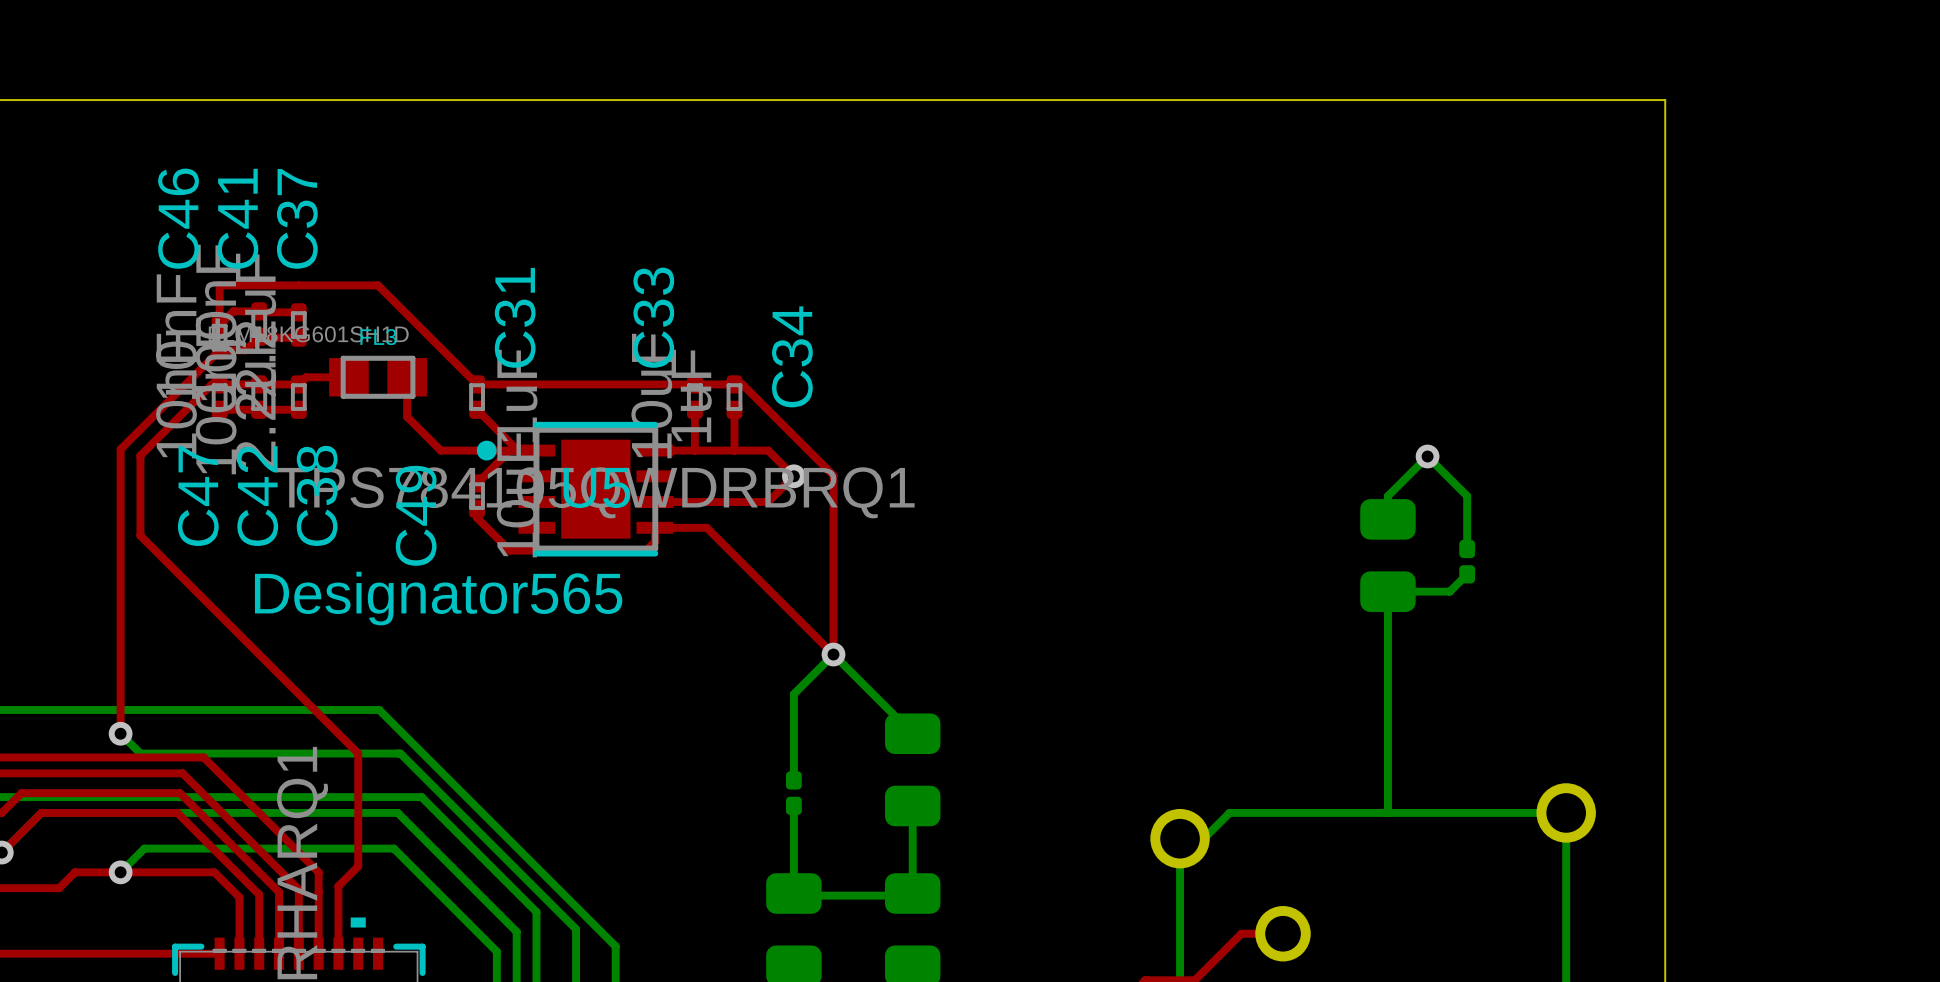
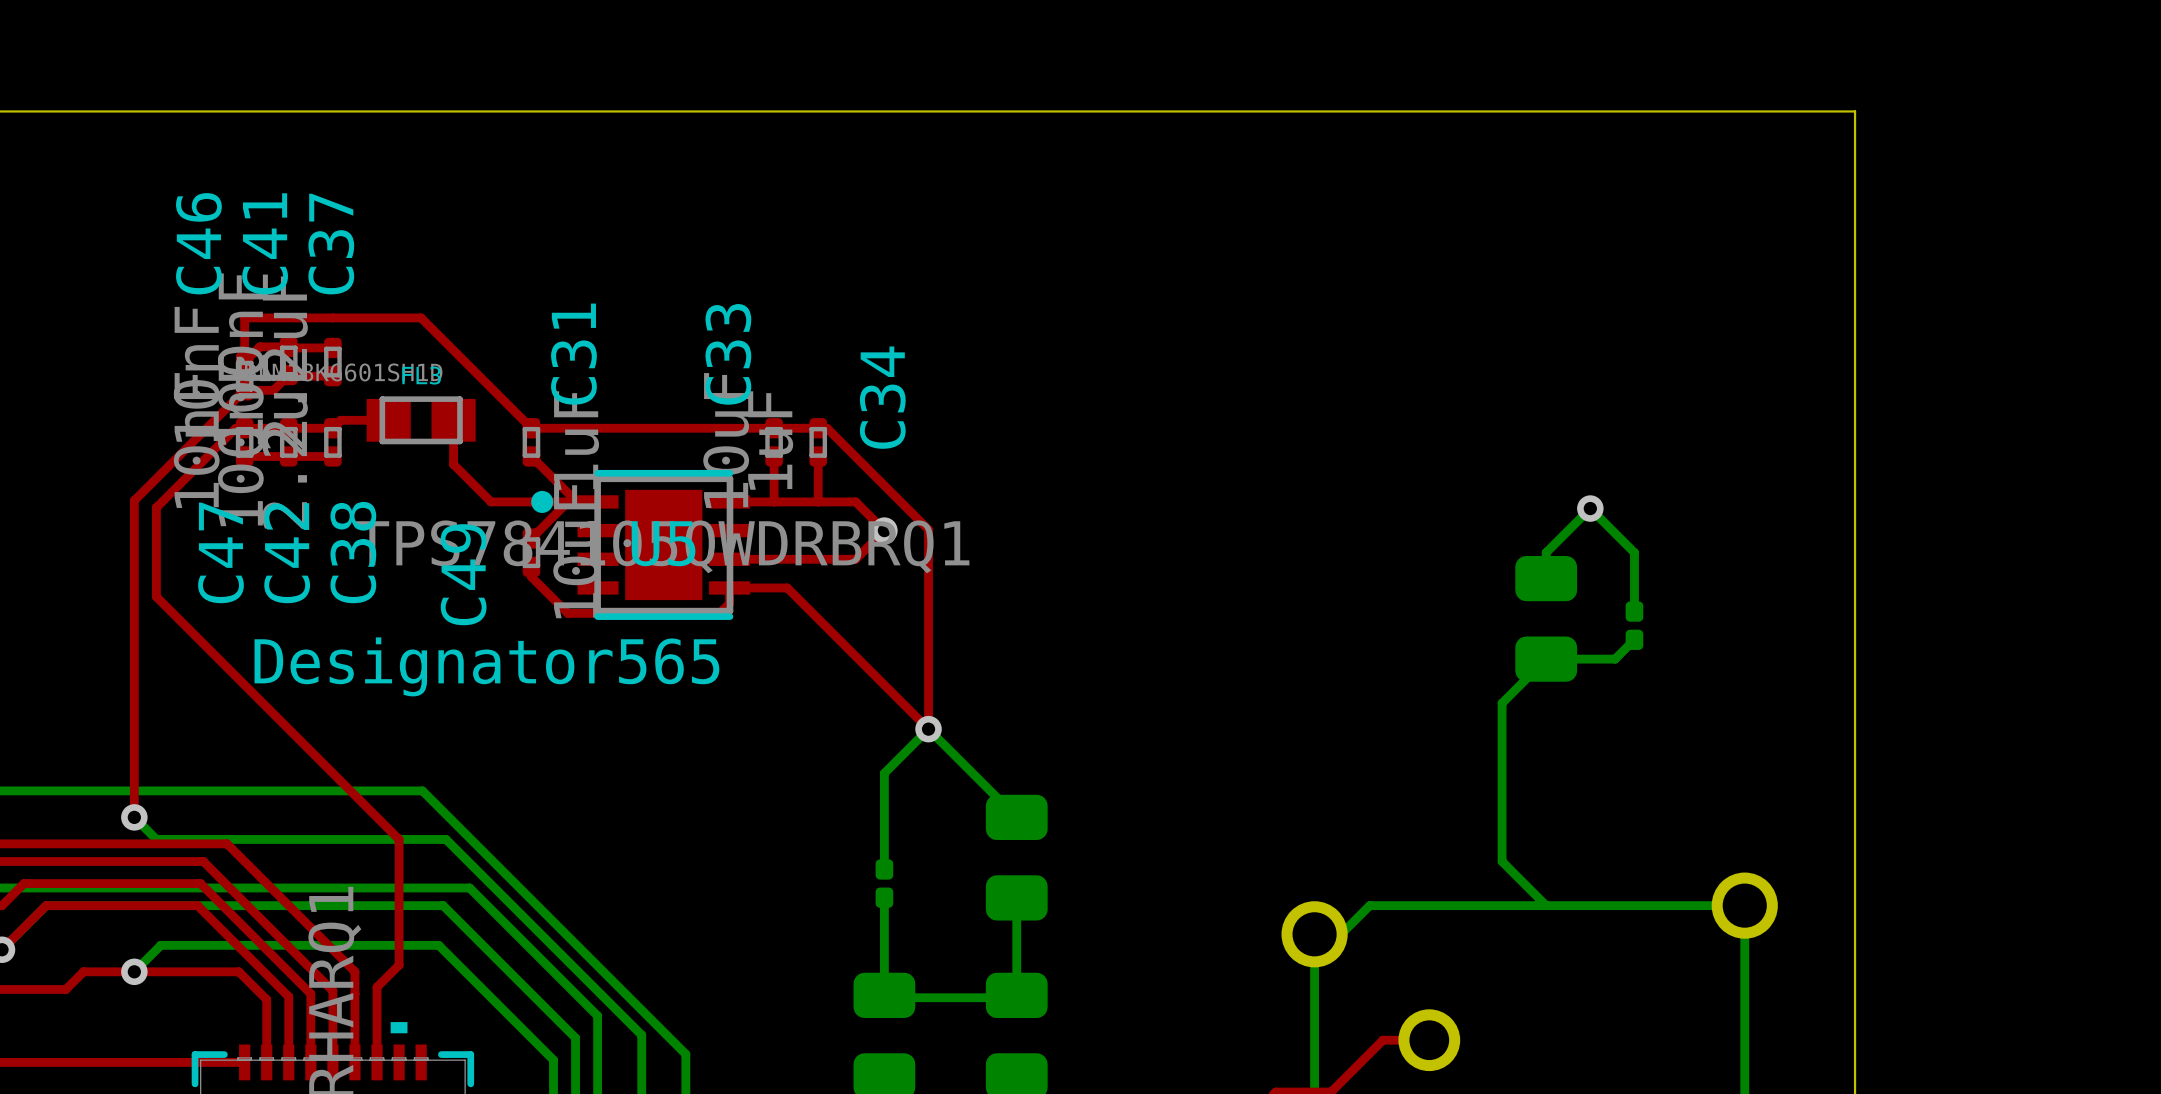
bottom track: (1387, 591) (1387, 812) -> (1546, 659) (1502, 703) (1502, 861) (1546, 905)

